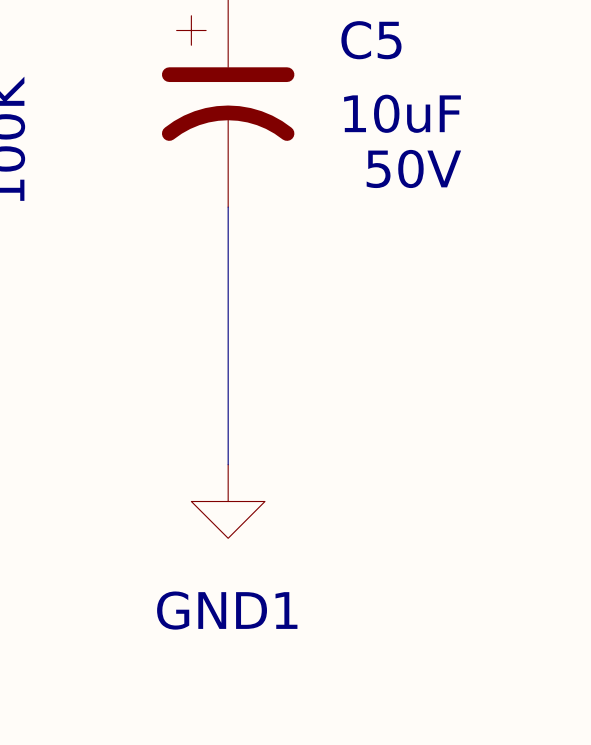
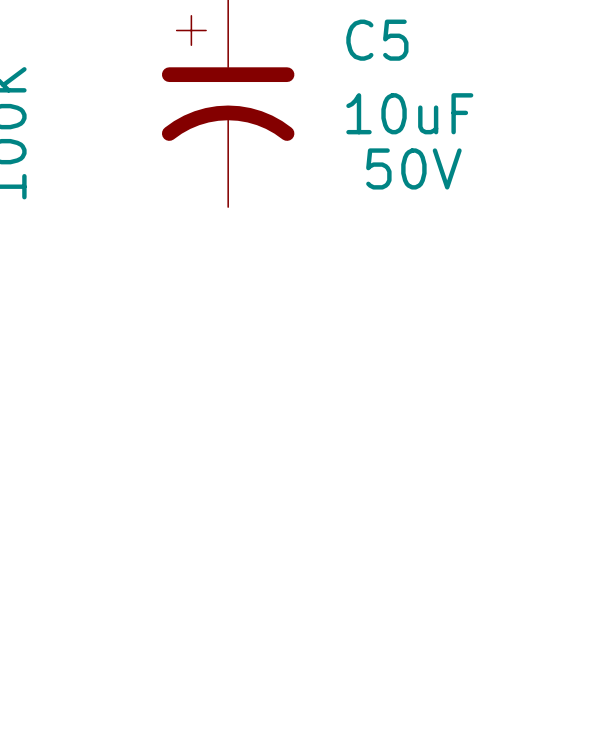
wire: (228, 207) (228, 464) -> none
power symbol: GND1 (228, 501) -> none

